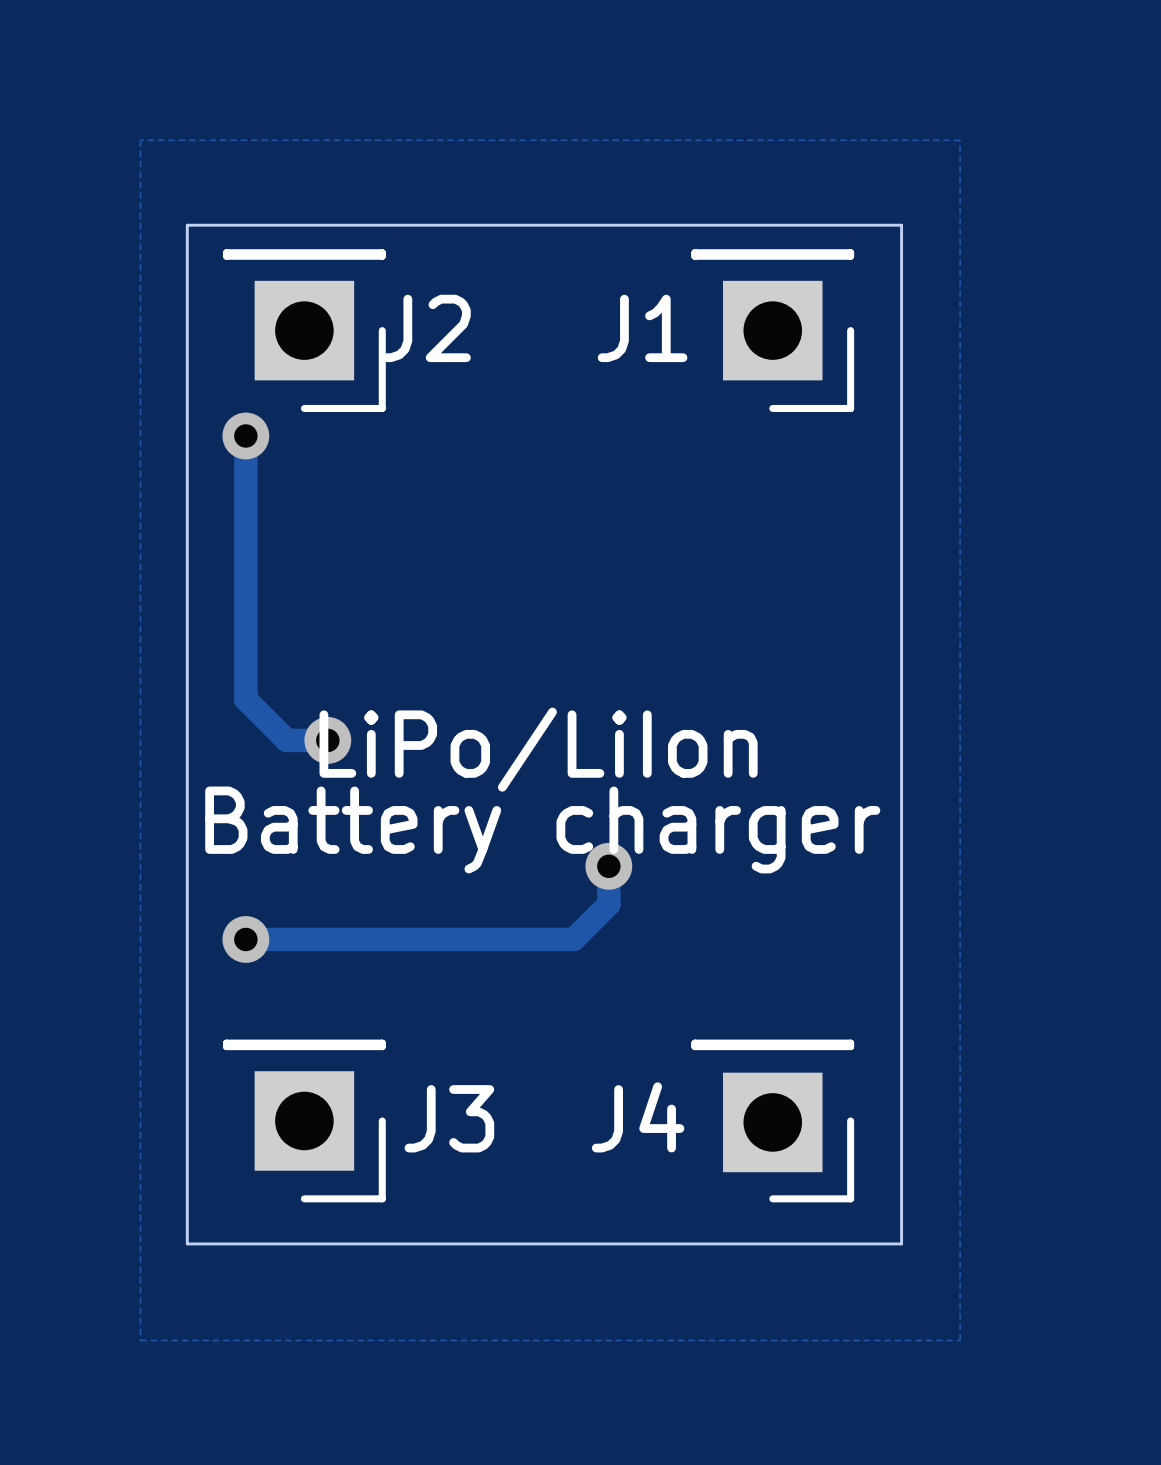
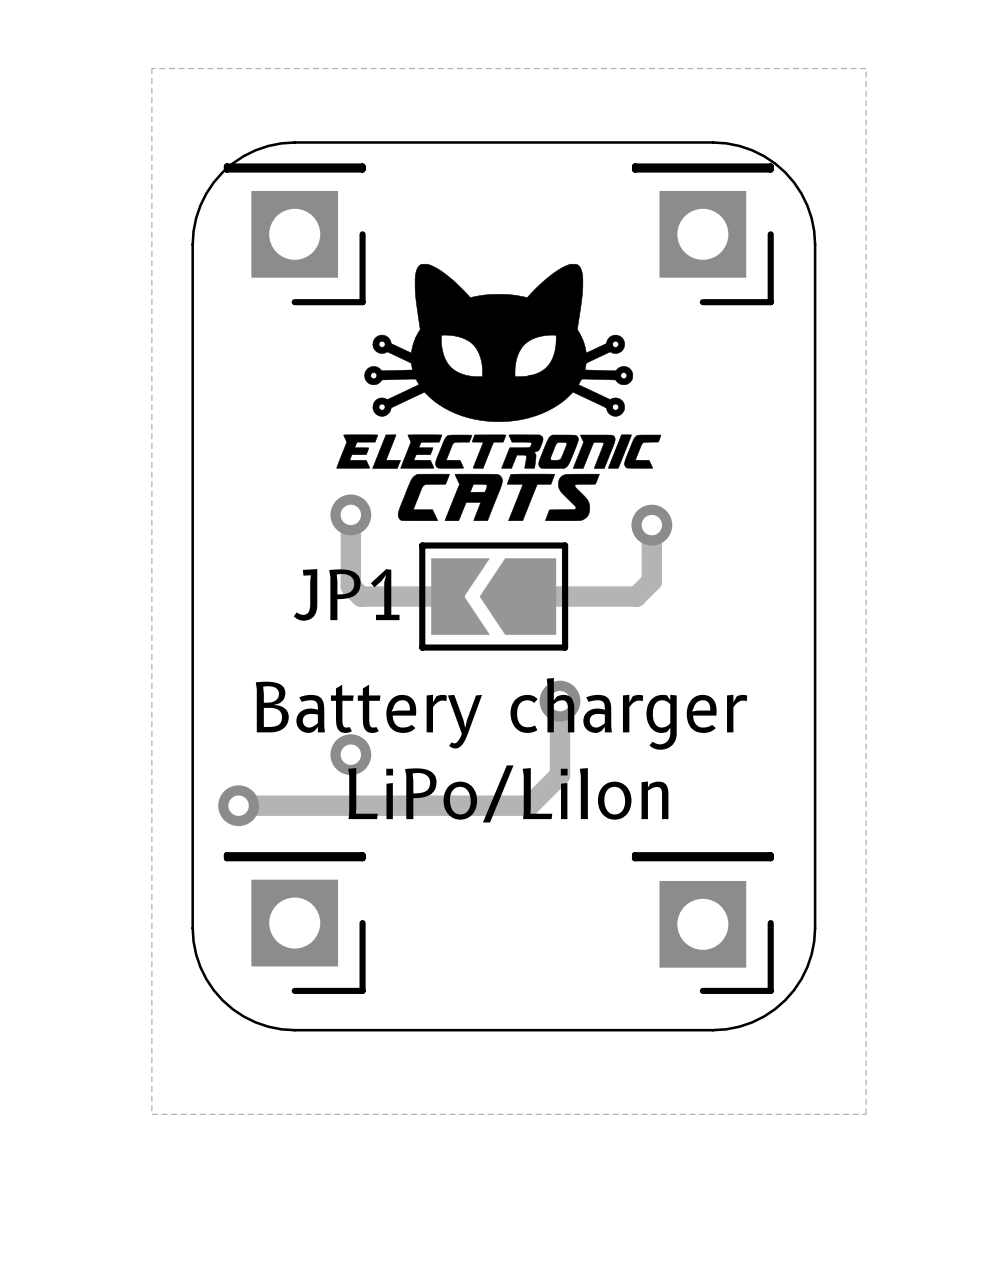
board edge: (304, 225) (187, 225) (187, 342) -> (294, 142) (268, 145) (255, 150) (243, 156) (222, 172) (213, 182) (200, 205) (193, 231) (192, 244)
board edge: (784, 225) (901, 225) (901, 342) -> (713, 142) (739, 145) (752, 150) (764, 156) (785, 172) (794, 182) (807, 205) (814, 231) (815, 244)
J2 name: J2 (425, 328) -> none
J1 name: J1 (642, 328) -> none
drawing: none -> [336, 263, 662, 522]
track: (245, 435) (245, 699) (286, 740) (327, 740) -> none
via: (245, 435) -> none
track: none -> (350, 514) (350, 586) (361, 596) (454, 596)
via: none -> (350, 514)
track: none -> (651, 525) (651, 581) (636, 596) (530, 596)
via: none -> (651, 525)
via: (327, 740) -> none
JP1: none -> (493, 596)
text position: LiPo/LiIon (538, 749) -> LiPo/LiIon (508, 793)
text position: Battery charger (542, 829) -> Battery charger (501, 713)
track: (608, 904) (573, 939) (245, 939) -> (560, 734) (560, 775) (529, 805) (238, 805)
via: none -> (350, 754)
via position: (245, 939) -> (238, 805)
J4 name: J4 (638, 1117) -> none
J3 name: J3 (449, 1118) -> none
board edge: (187, 1126) (187, 1243) (304, 1243) -> (192, 928) (193, 941) (200, 967) (213, 990) (222, 1000) (243, 1016) (255, 1022) (268, 1026) (294, 1030)
board edge: (901, 1126) (901, 1243) (784, 1243) -> (815, 928) (814, 941) (807, 967) (794, 990) (785, 1000) (764, 1016) (752, 1022) (739, 1026) (713, 1030)

